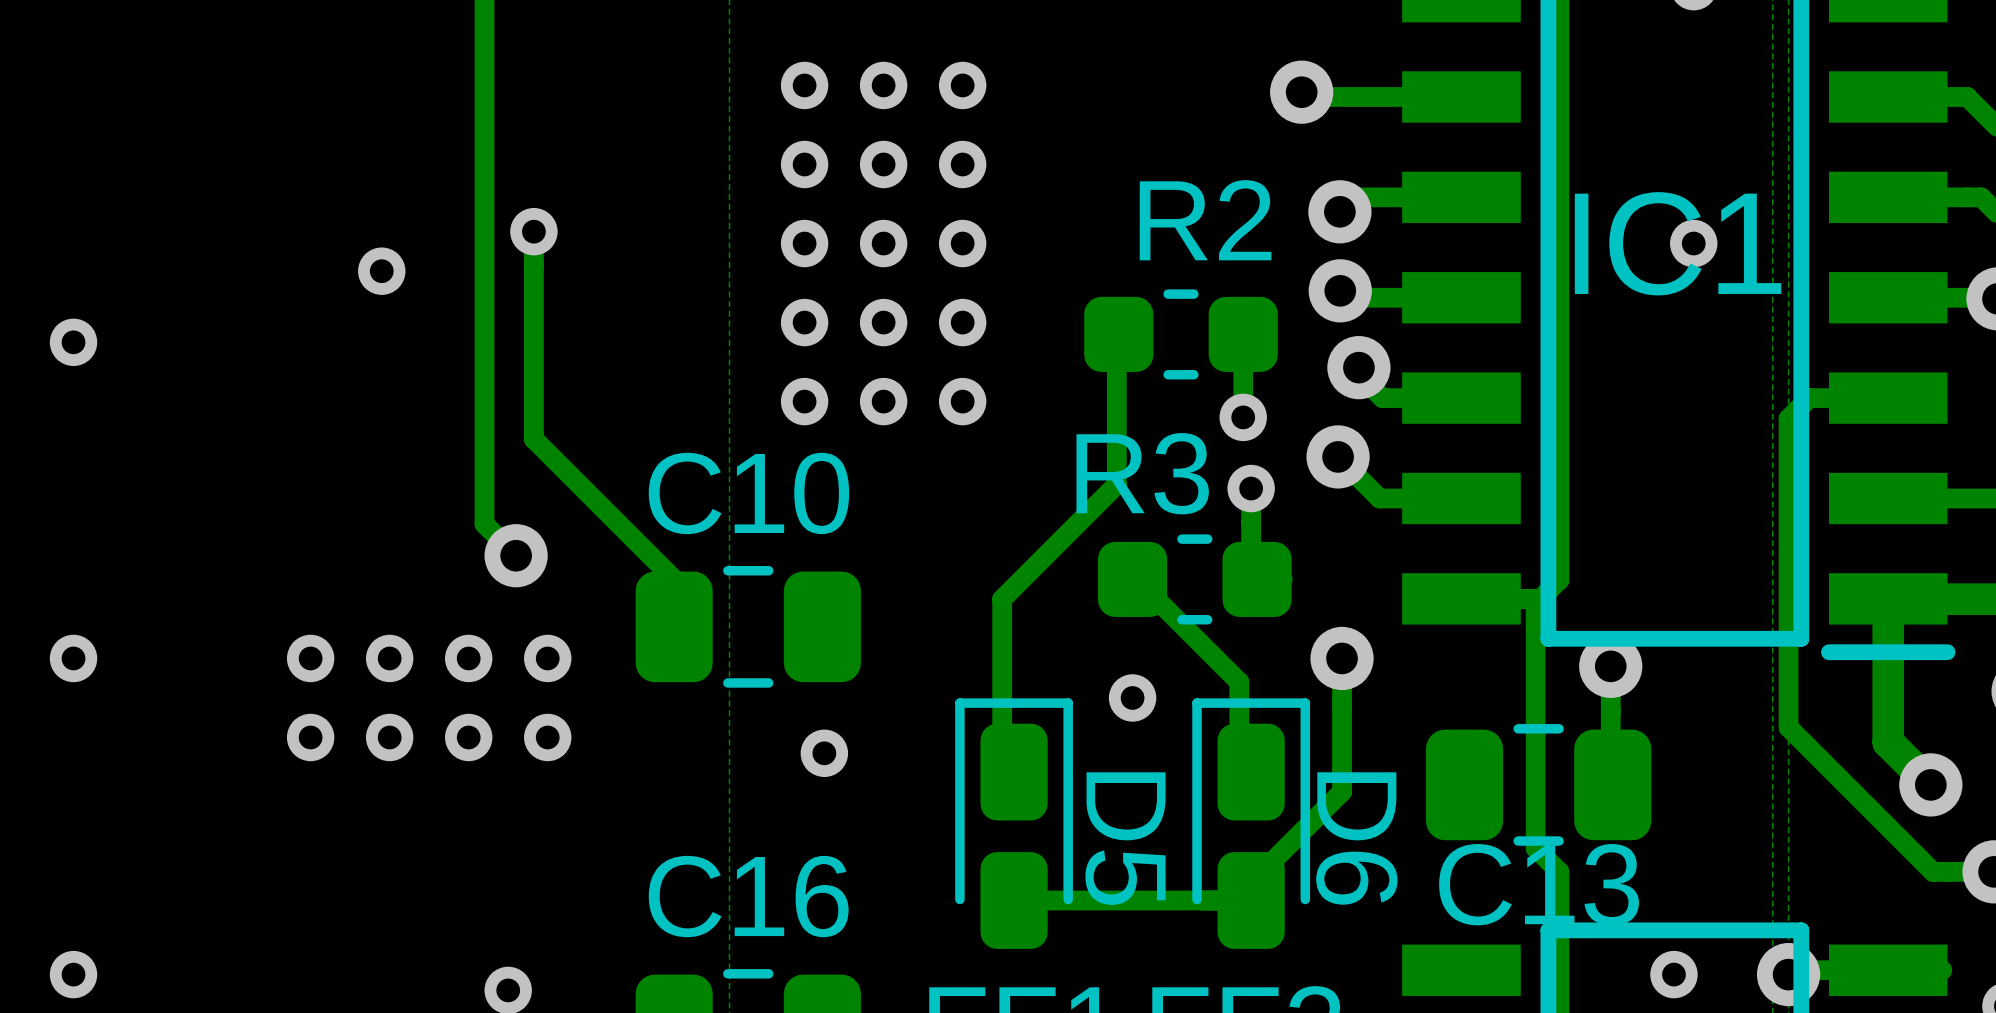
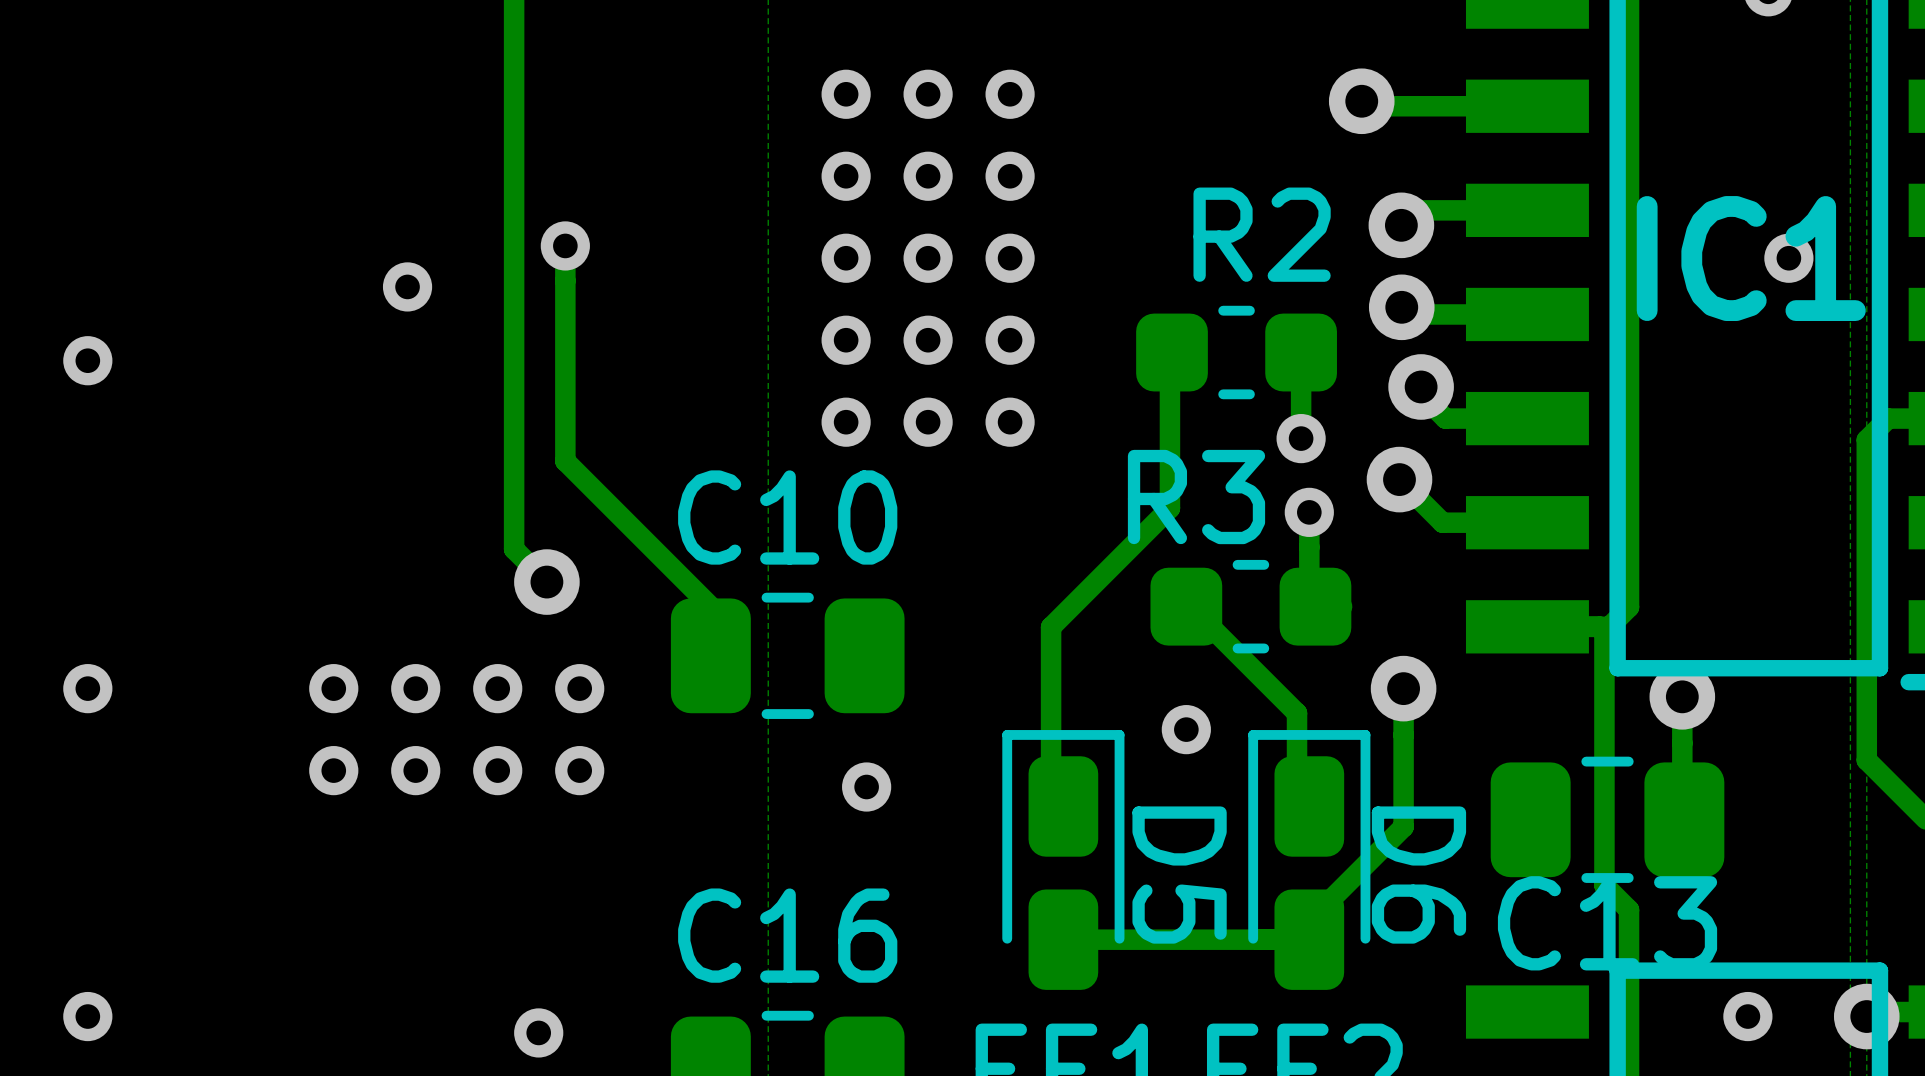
via position: (1693, 243) -> (1788, 258)

